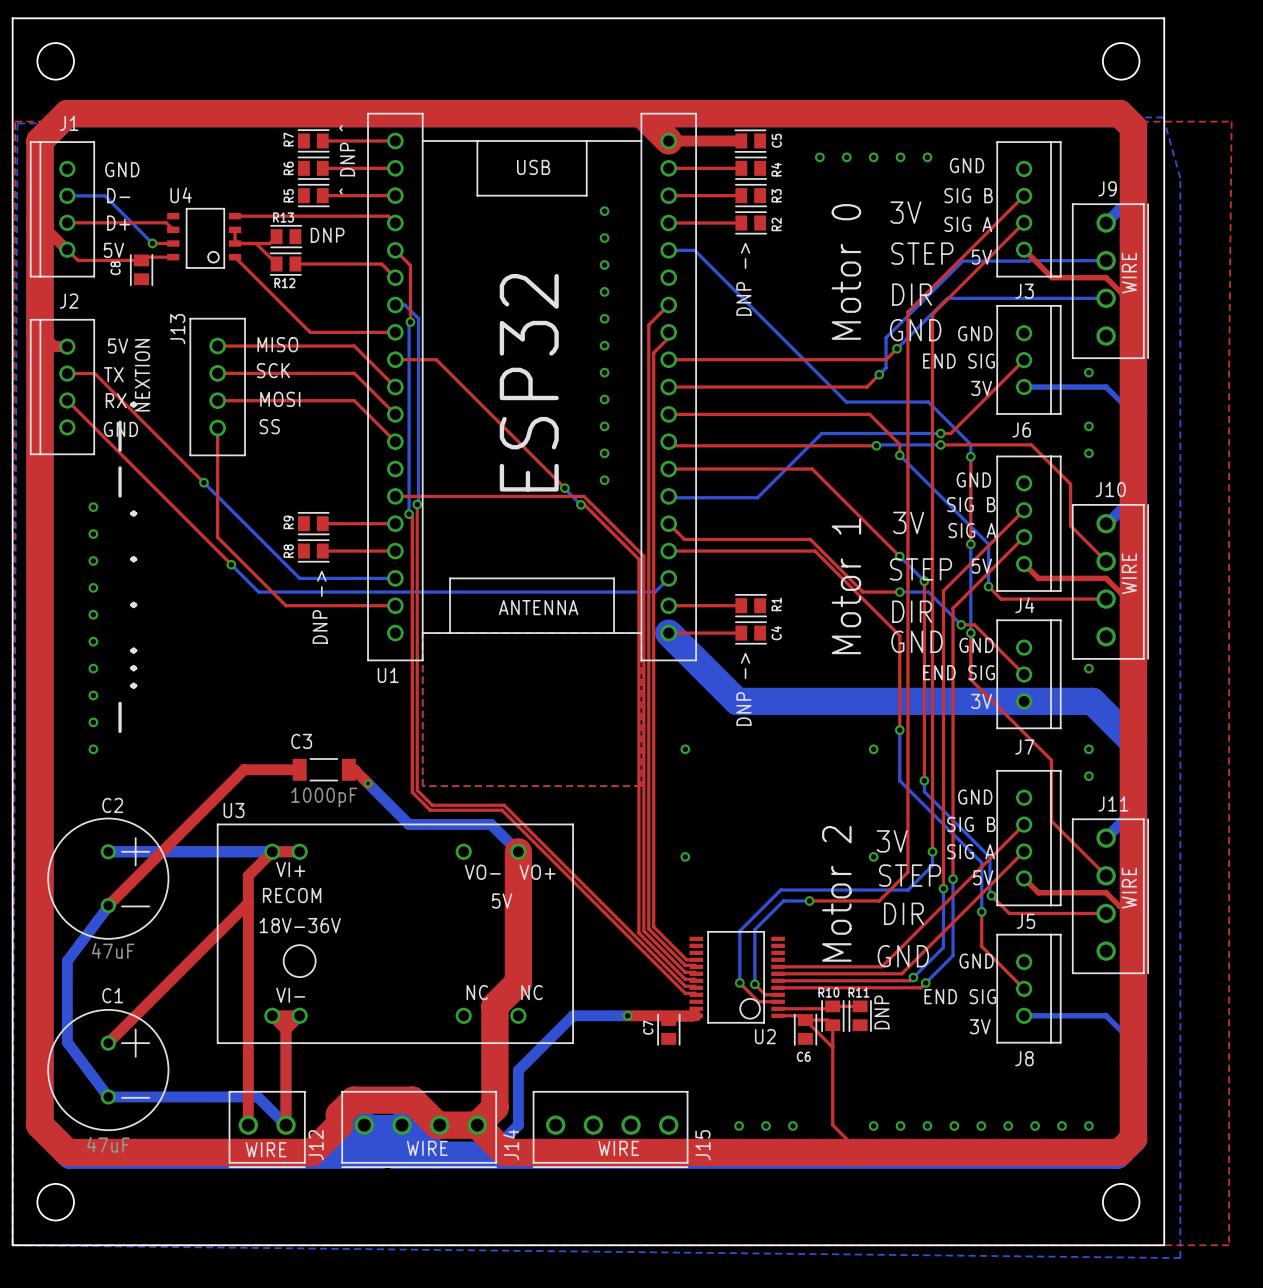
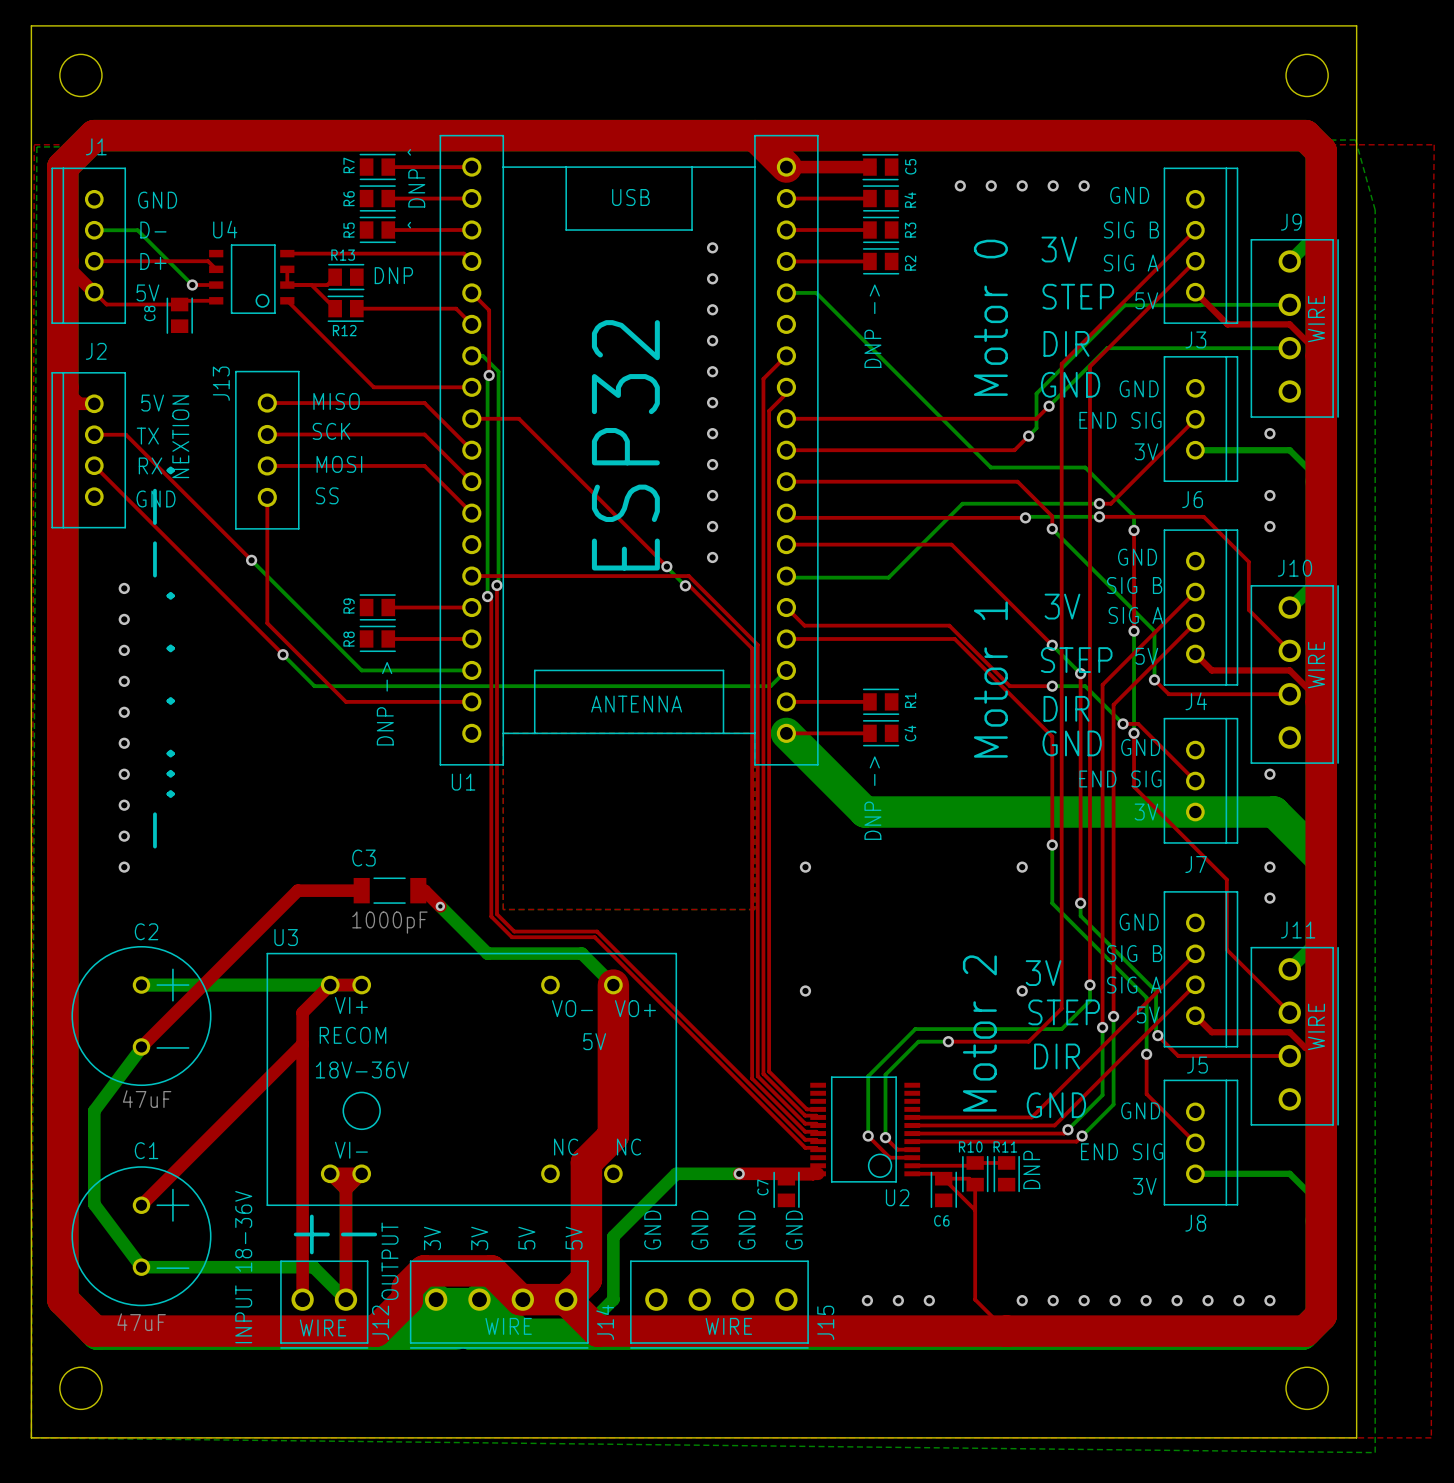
text: none -> GND (652, 1230)
text: none -> GND (699, 1230)
text: none -> GND (747, 1230)
text: none -> GND (794, 1230)
text: none -> + (311, 1234)
text: none -> - (359, 1234)
text: none -> 3V (432, 1238)
text: none -> 3V (479, 1238)
text: none -> 5V (526, 1238)
text: none -> 5V (574, 1238)
text: none -> OUTPUT (390, 1261)
text: none -> INPUT 18-36V (243, 1267)

